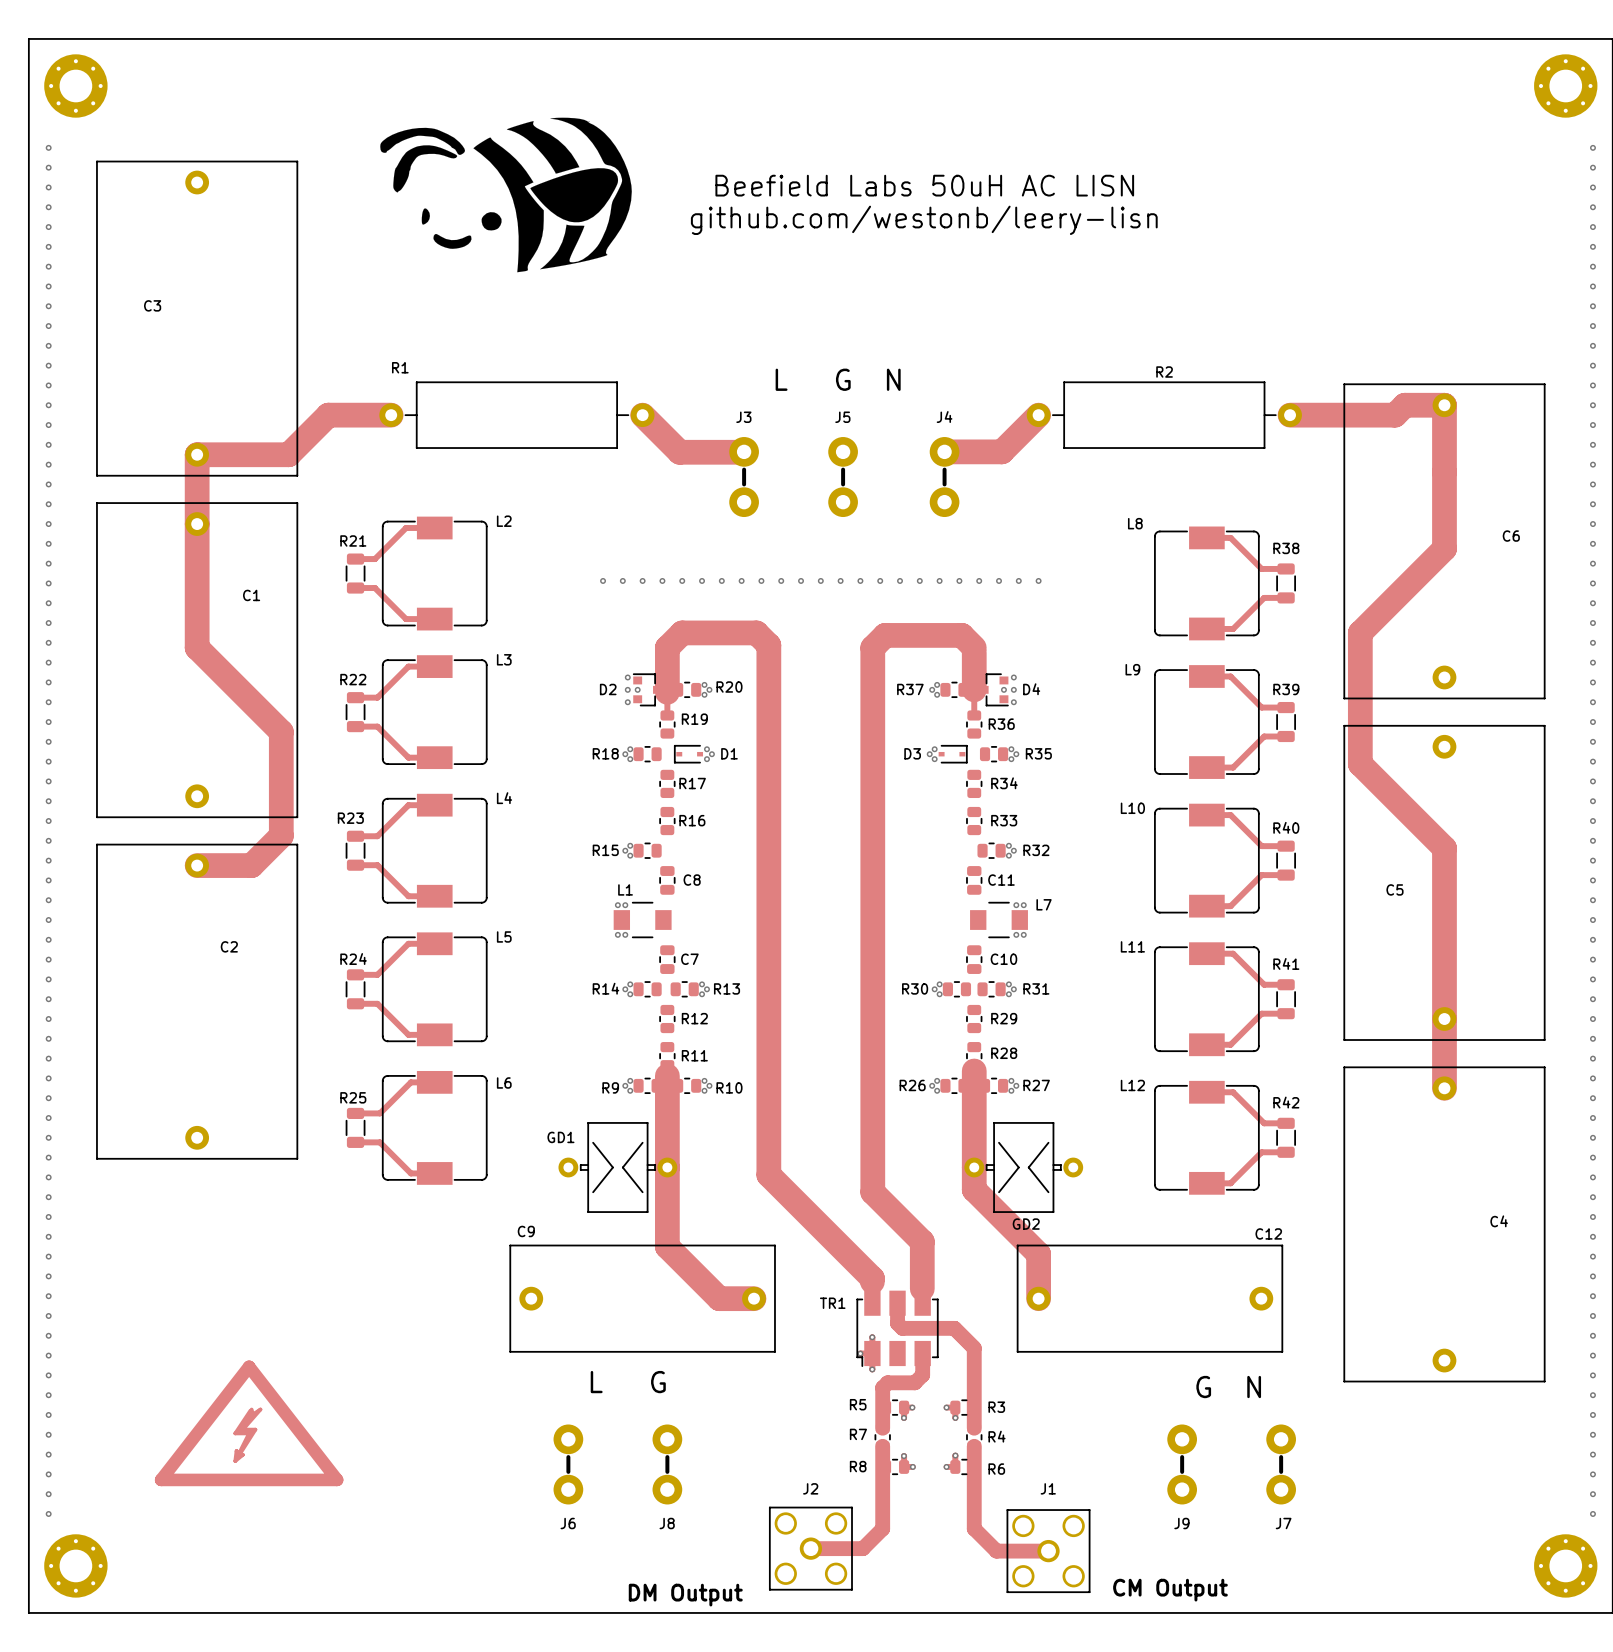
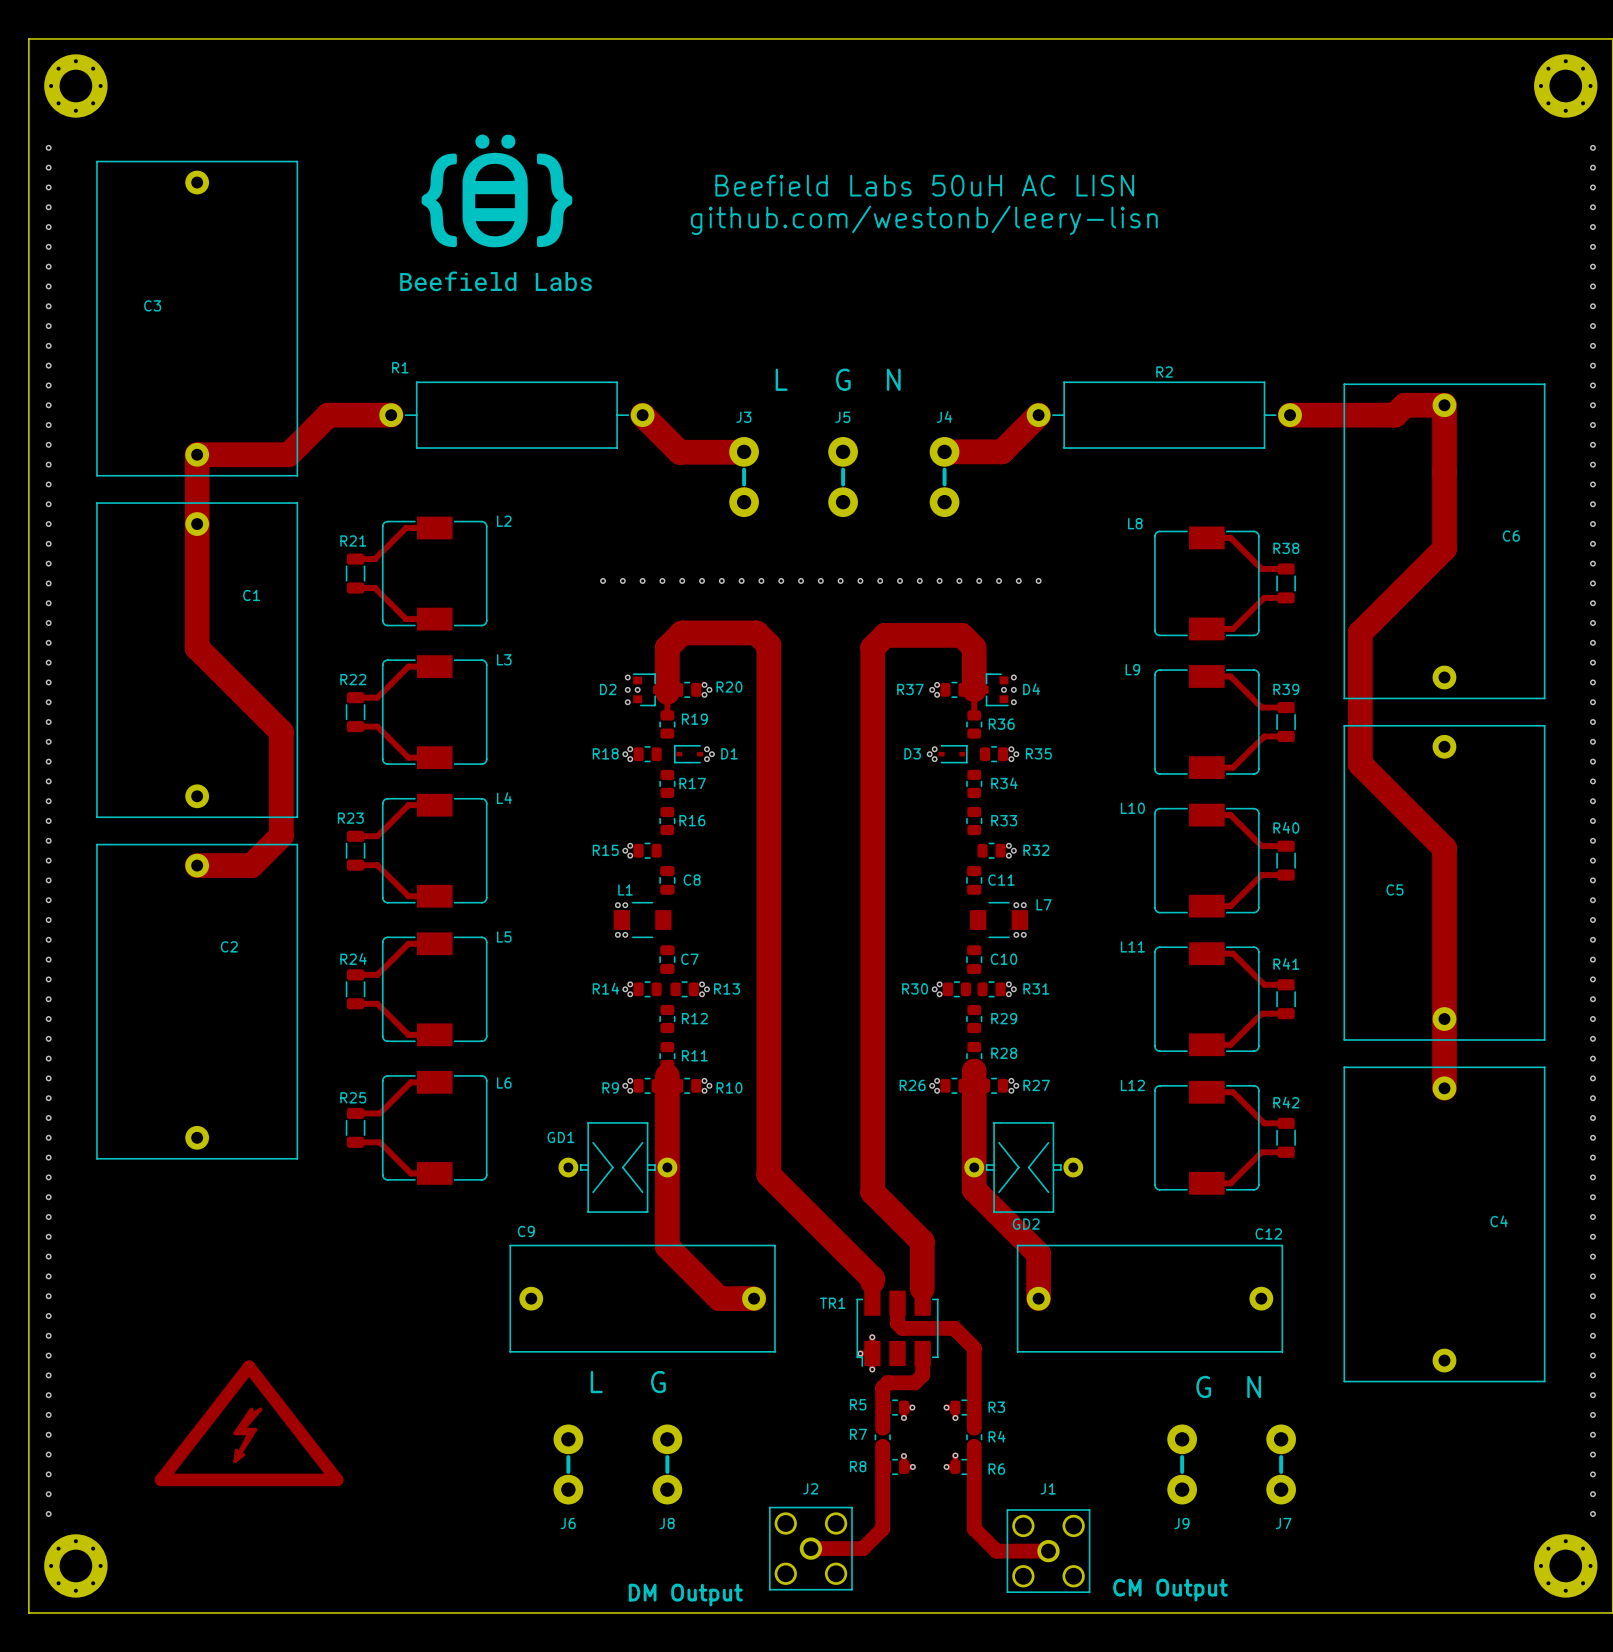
drawing: [380, 117, 632, 273] -> none
drawing: none -> [400, 134, 592, 292]

